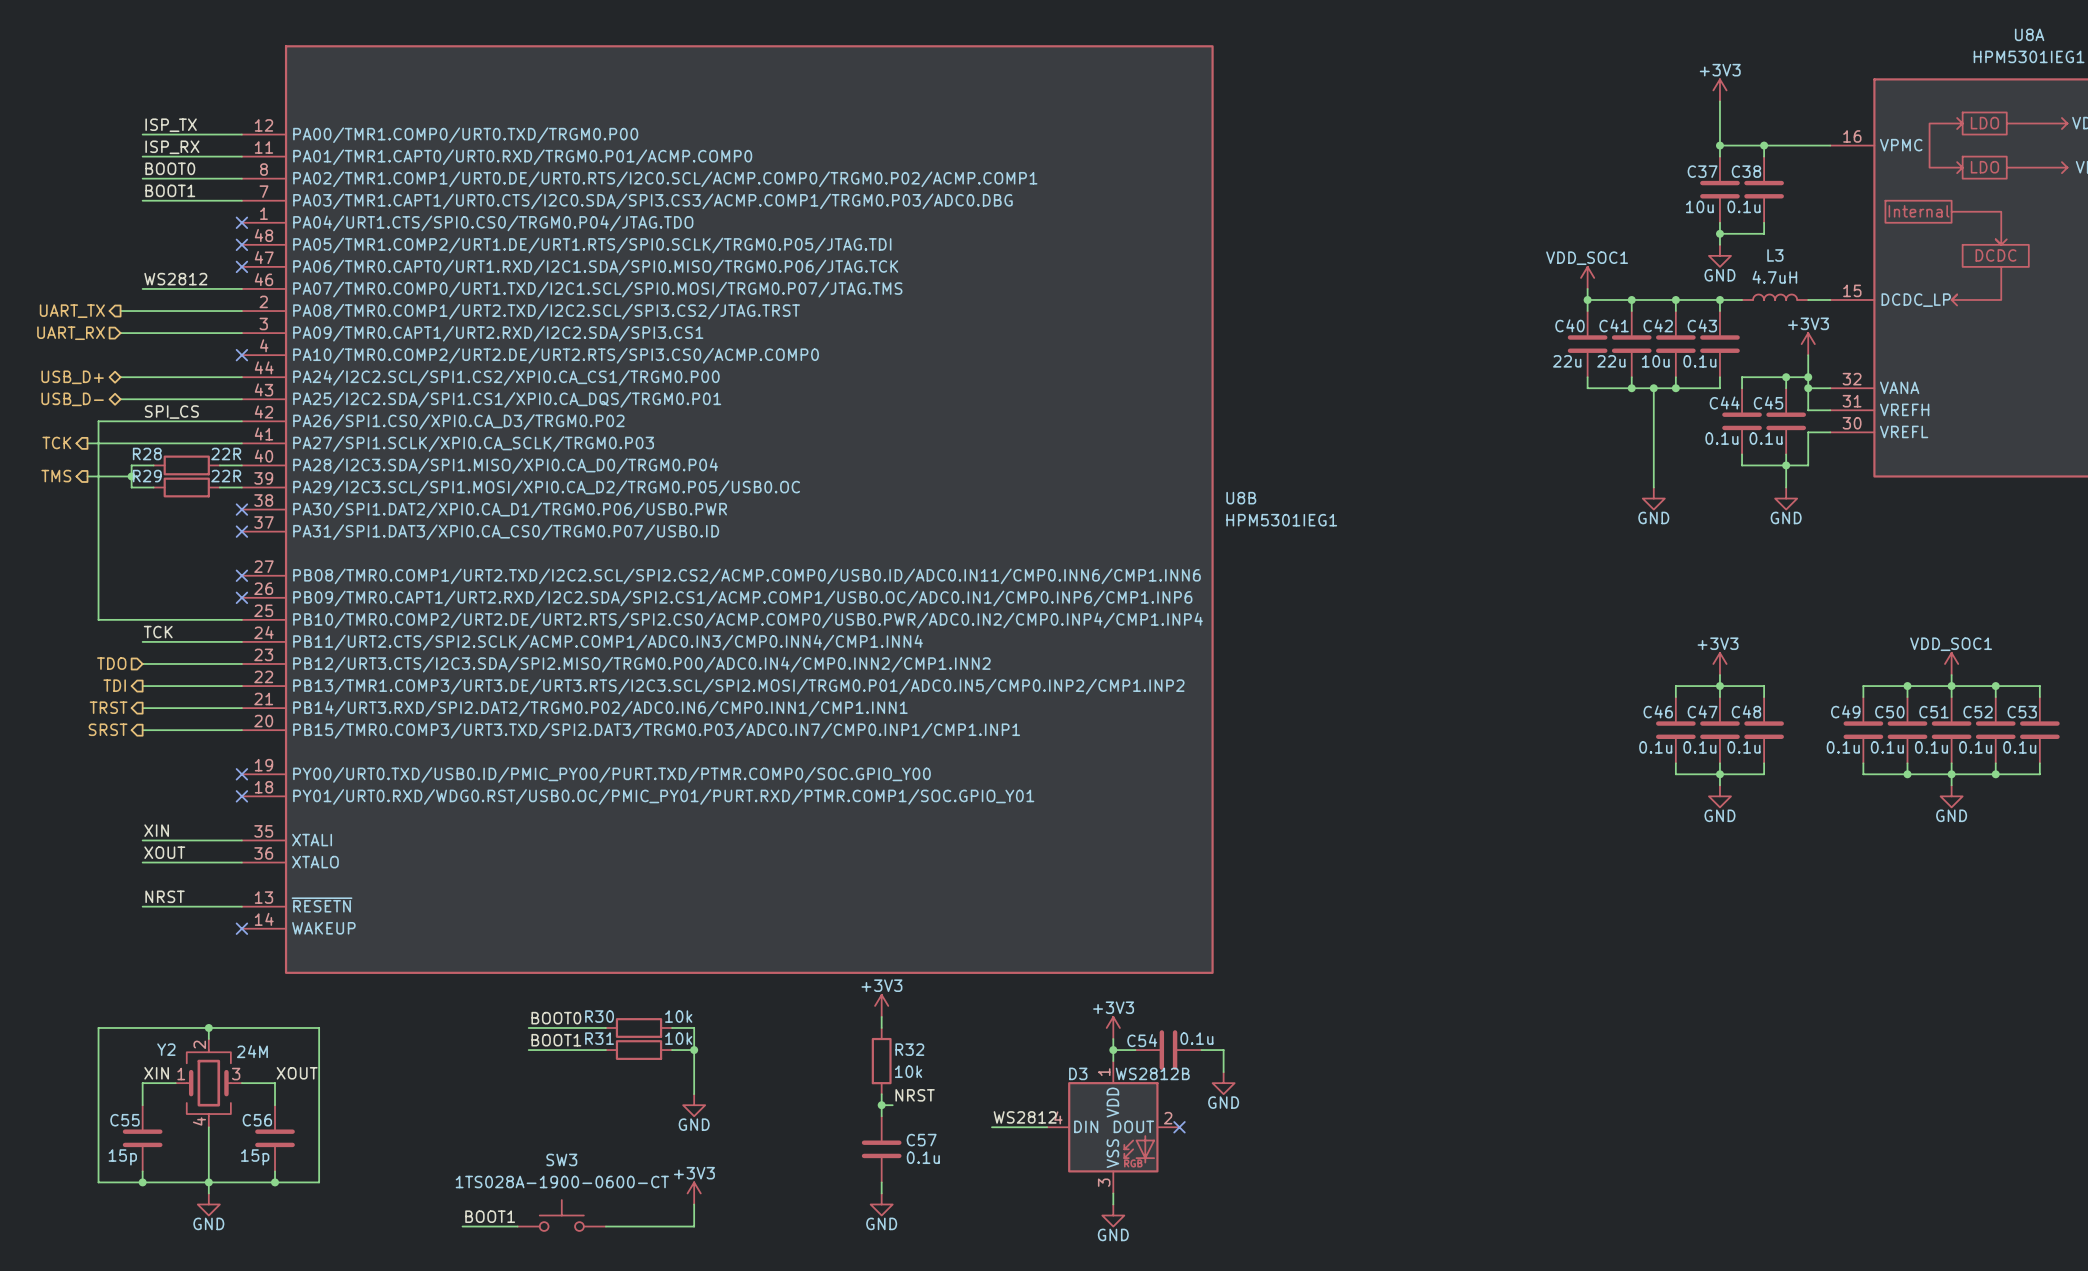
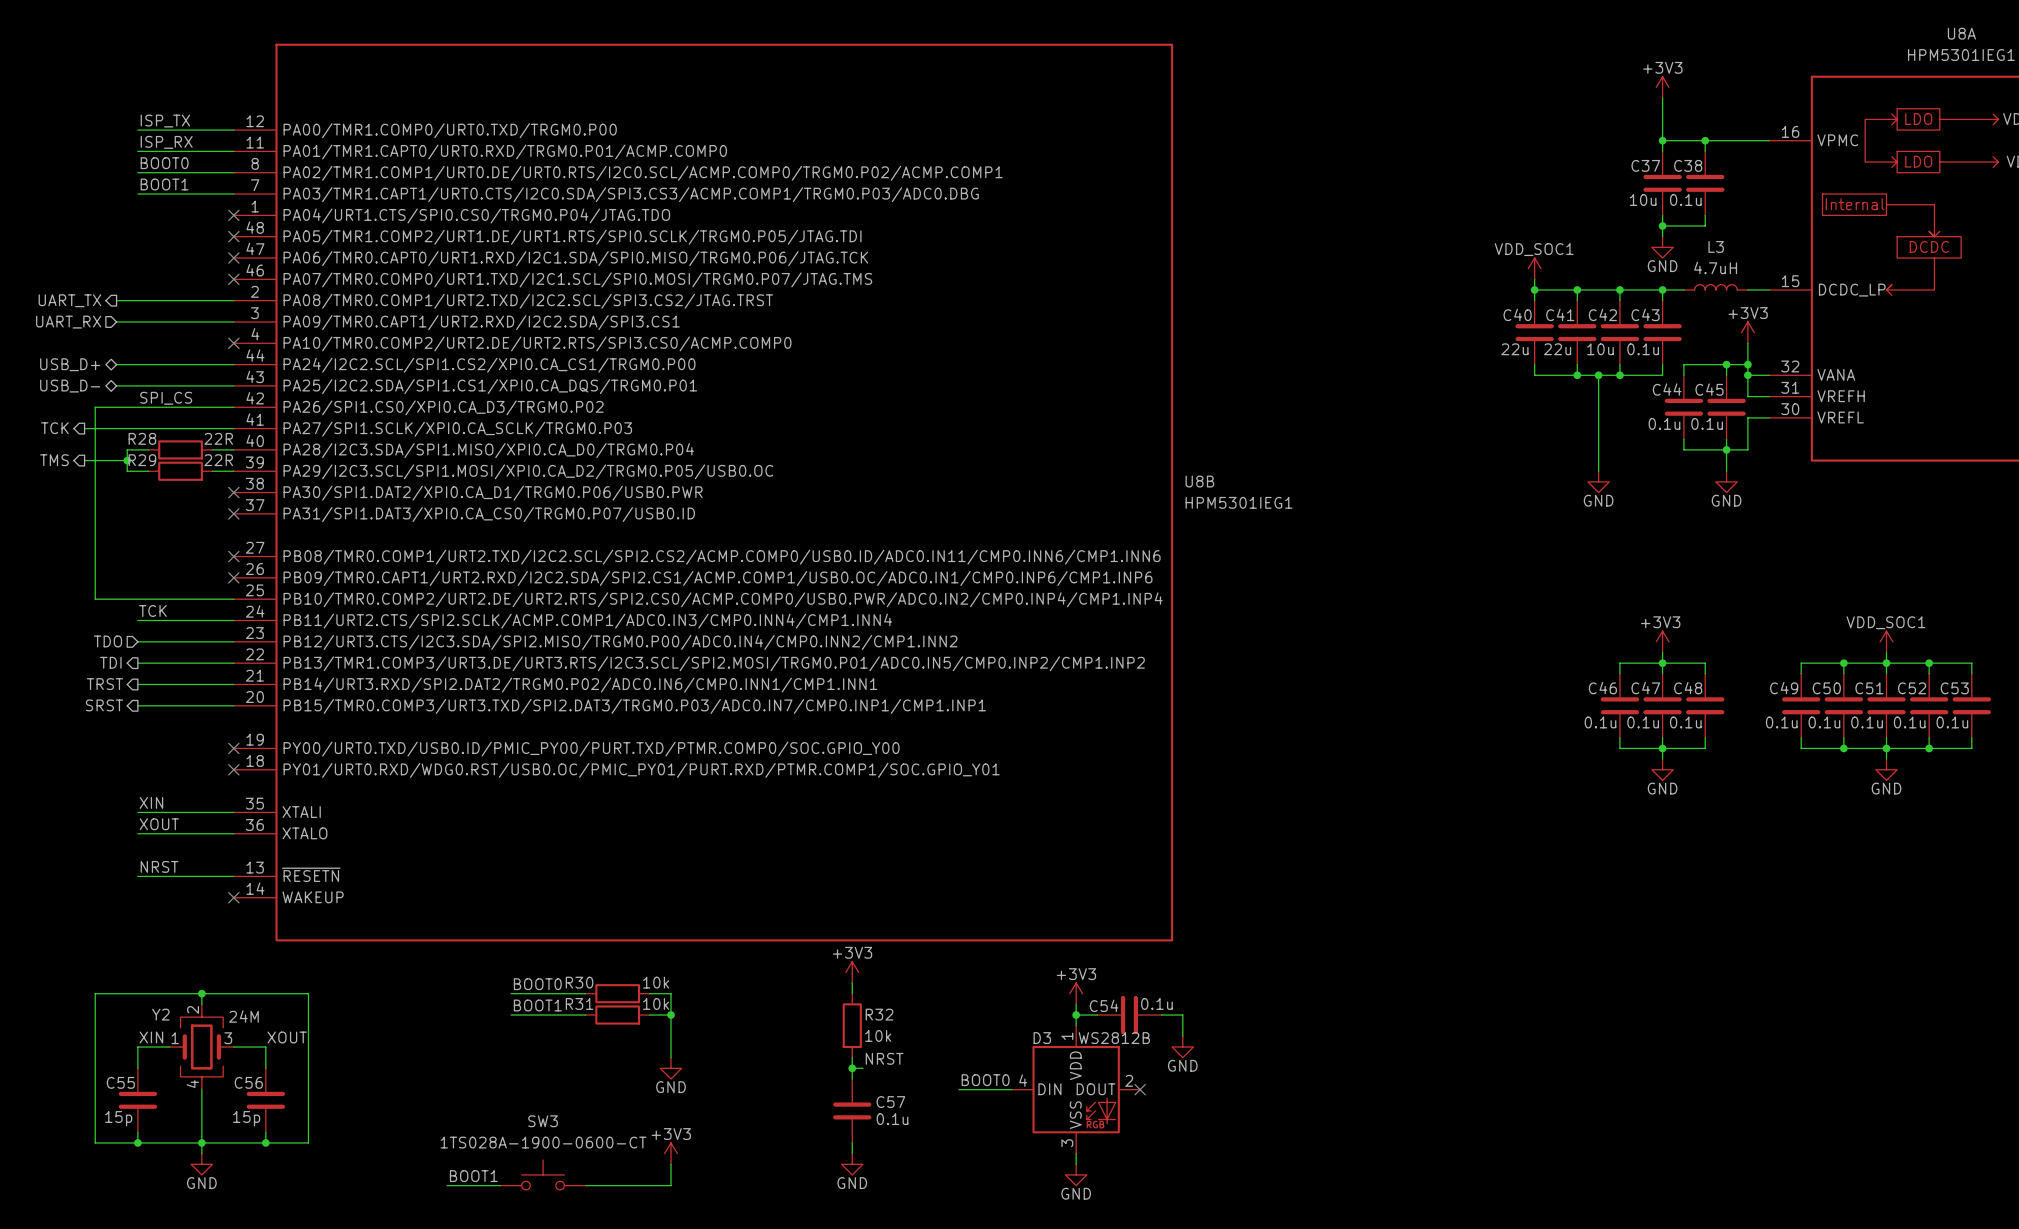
label: WS2812 (175, 279) -> none
wire: (142, 288) (241, 288) -> none
no-connect mark: none -> (233, 279)
label: WS2812 (1025, 1117) -> BOOT0 (985, 1080)

